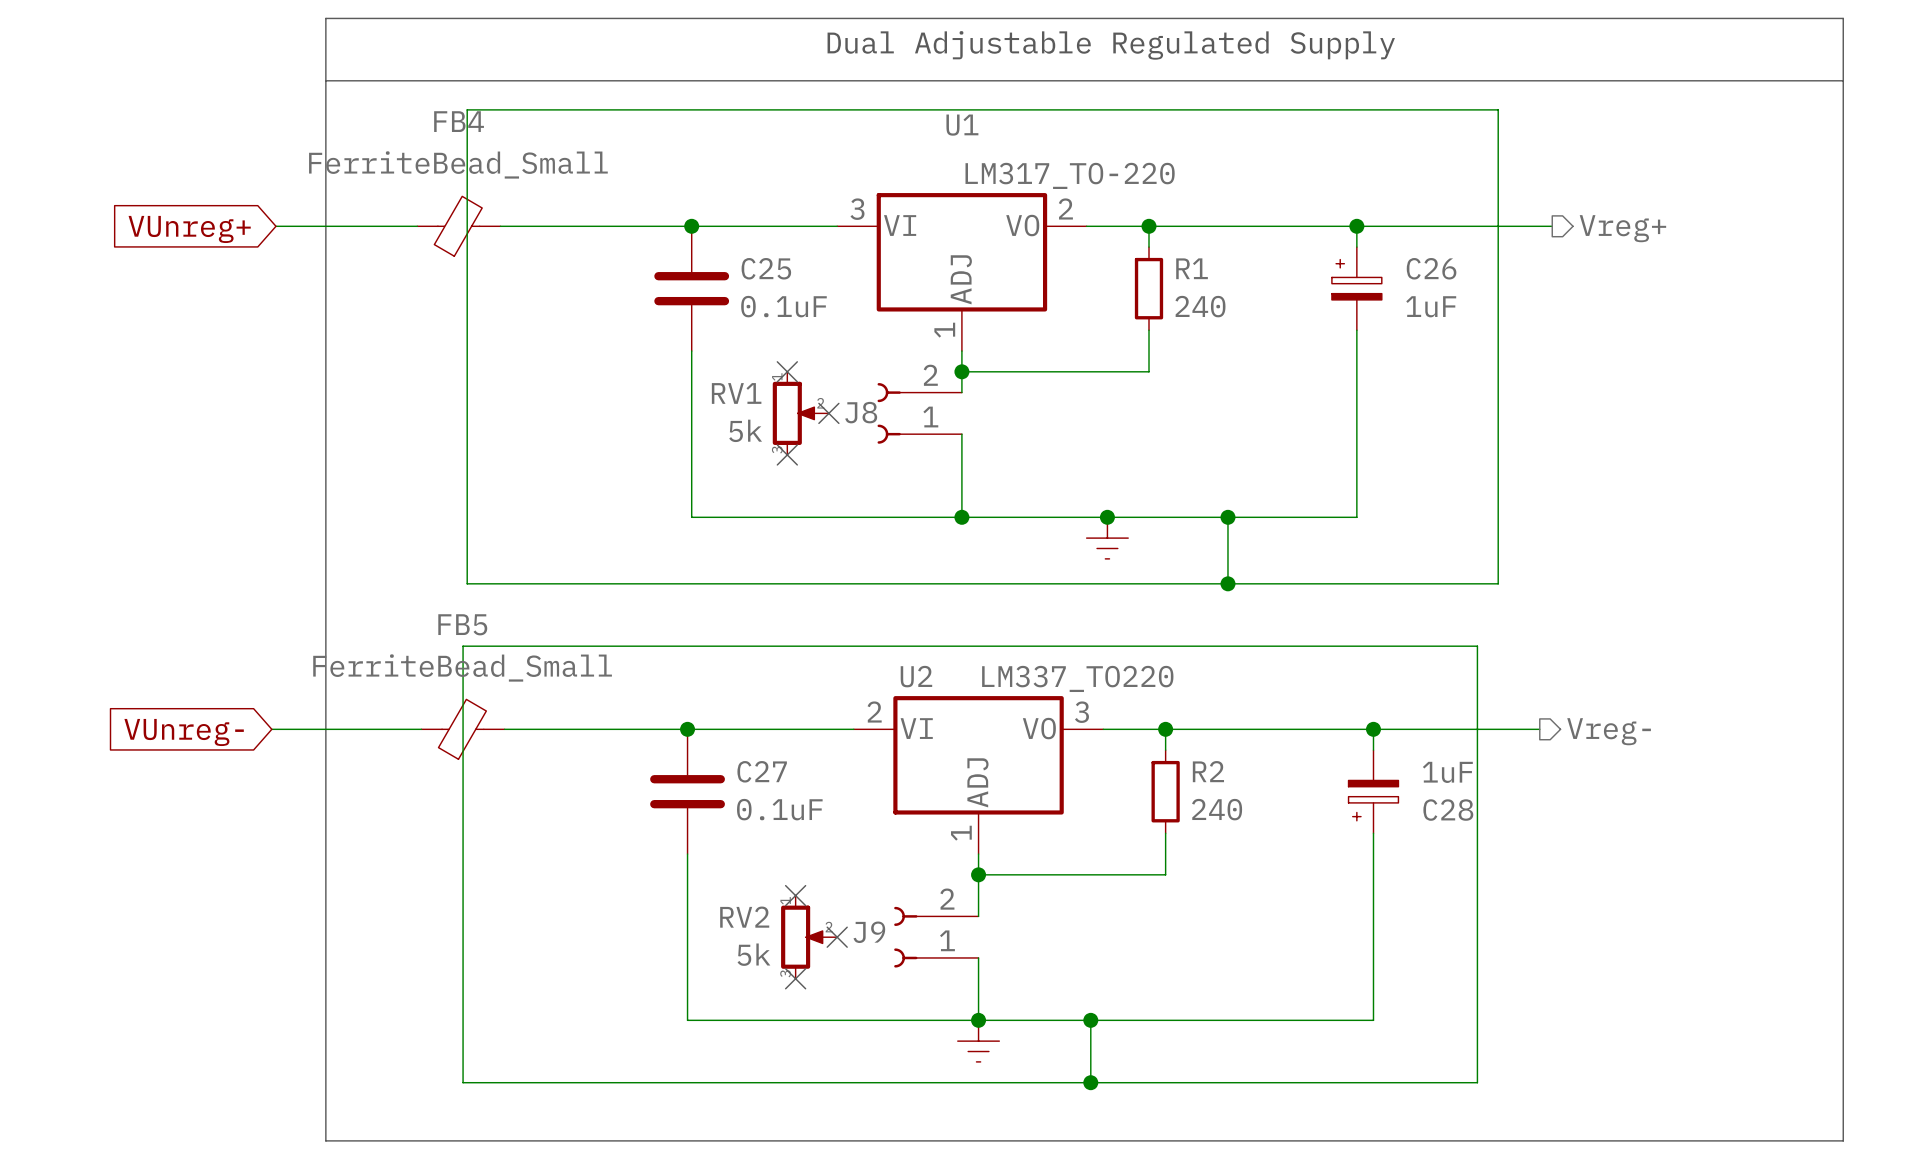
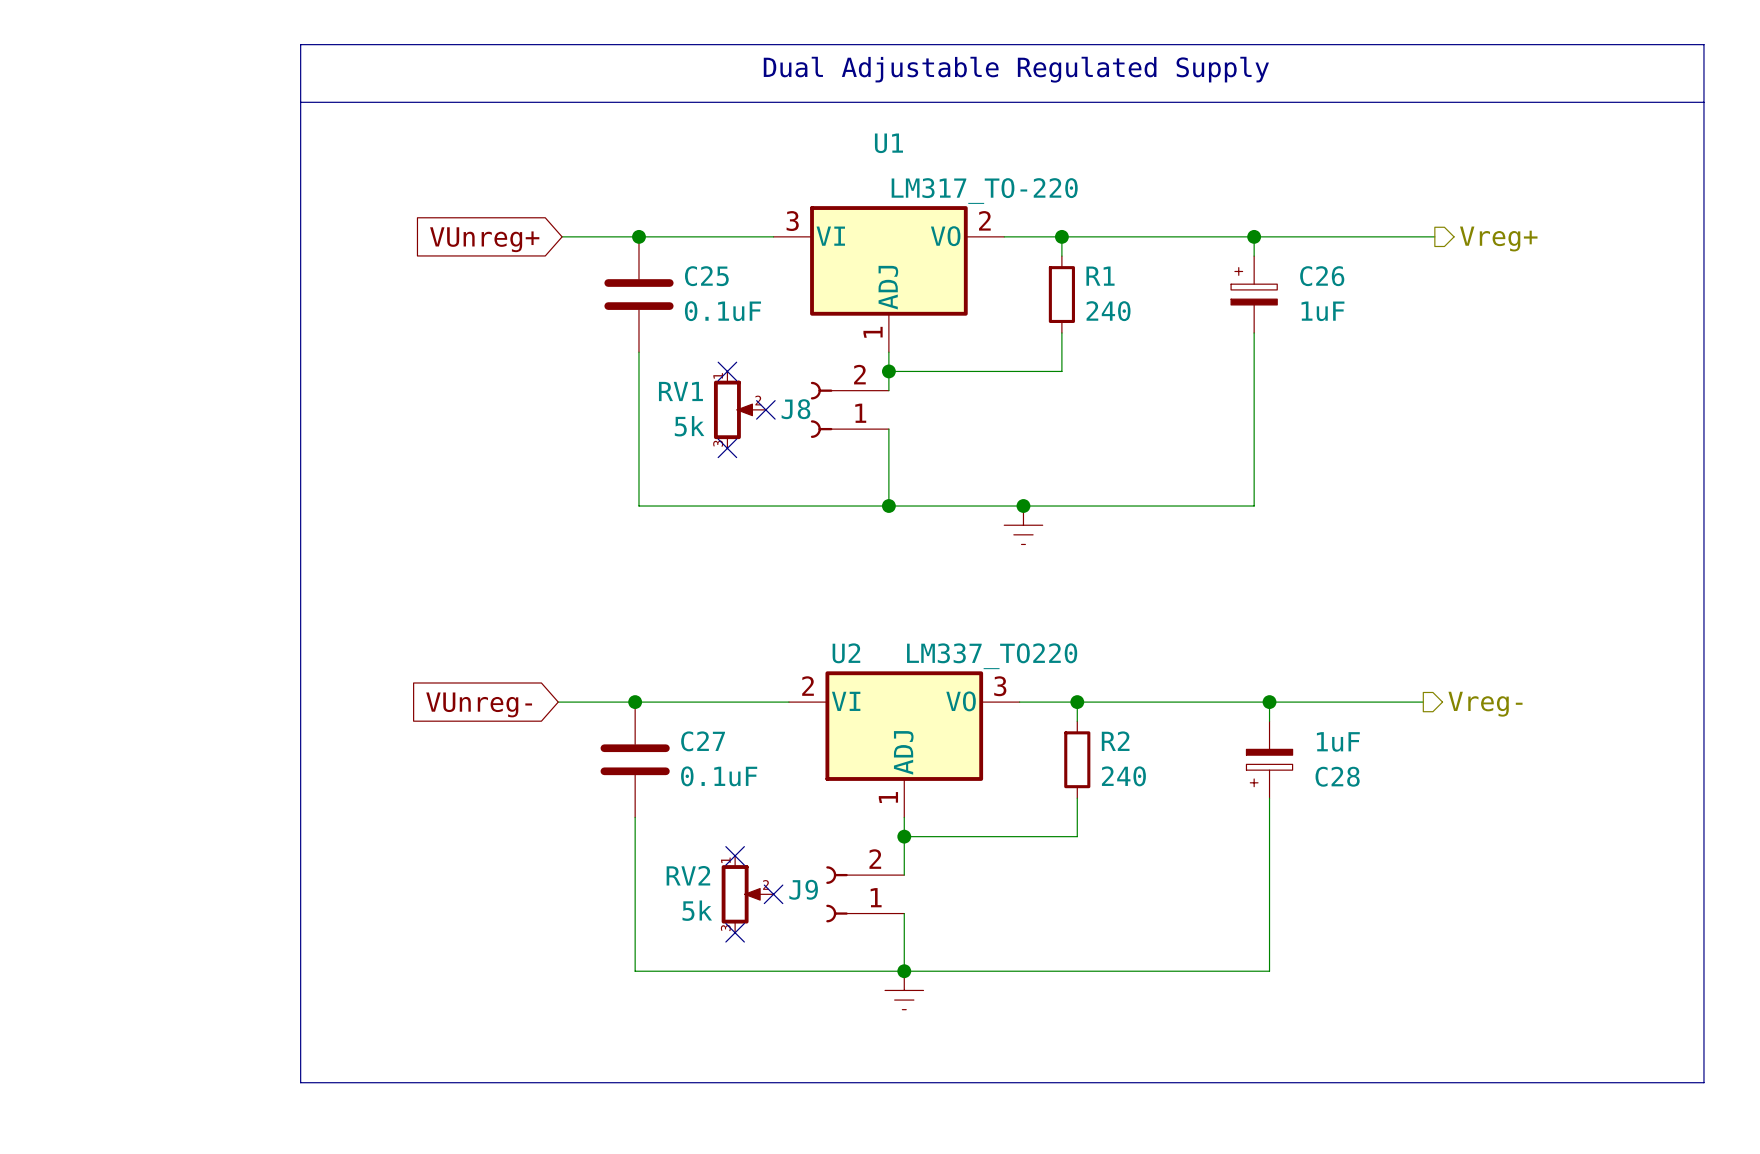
wire: (467, 109) (467, 583) (1498, 583) (1498, 109) (467, 109) -> none
wire: (275, 226) (417, 226) -> none
FB4: FerriteBead_Small (458, 226) -> none
wire: (500, 226) (608, 226) -> none
global label position: VUnreg+ (189, 229) -> VUnreg+ (484, 239)
wire: (1227, 517) (1227, 583) -> none
junction: (1227, 517) -> none
junction: (1227, 583) -> none
wire: (463, 646) (463, 1082) (1477, 1082) (1477, 646) (463, 646) -> none
wire: (271, 729) (421, 729) -> none
FB5: FerriteBead_Small (463, 729) -> none
wire: (504, 729) (604, 729) -> none
global label position: VUnreg- (184, 732) -> VUnreg- (479, 704)
wire: (1090, 1020) (1090, 1082) -> none
junction: (1090, 1020) -> none
junction: (1090, 1082) -> none

